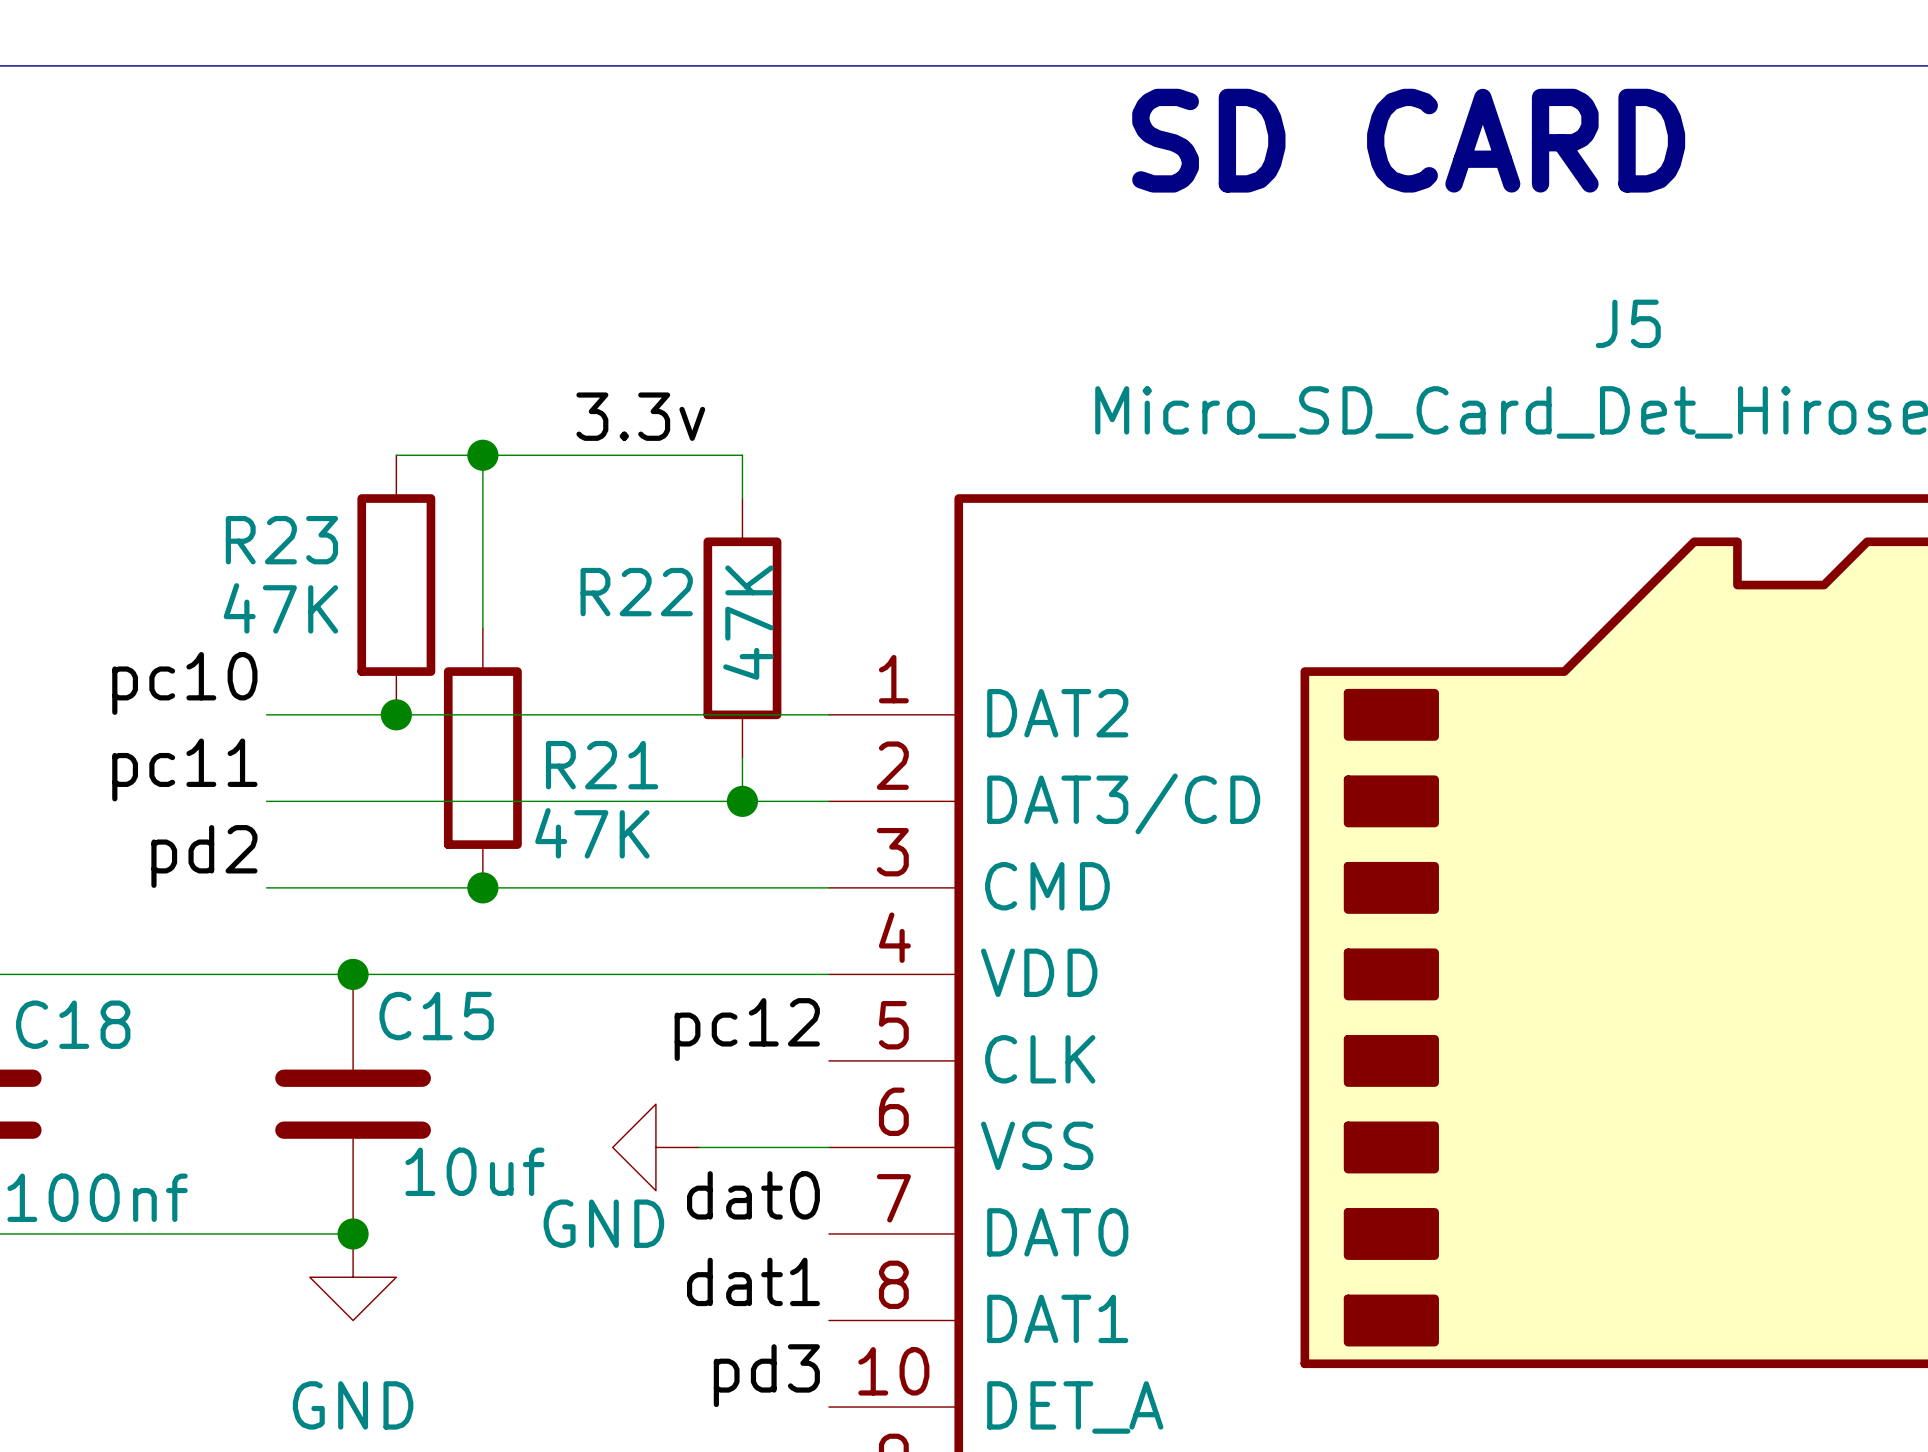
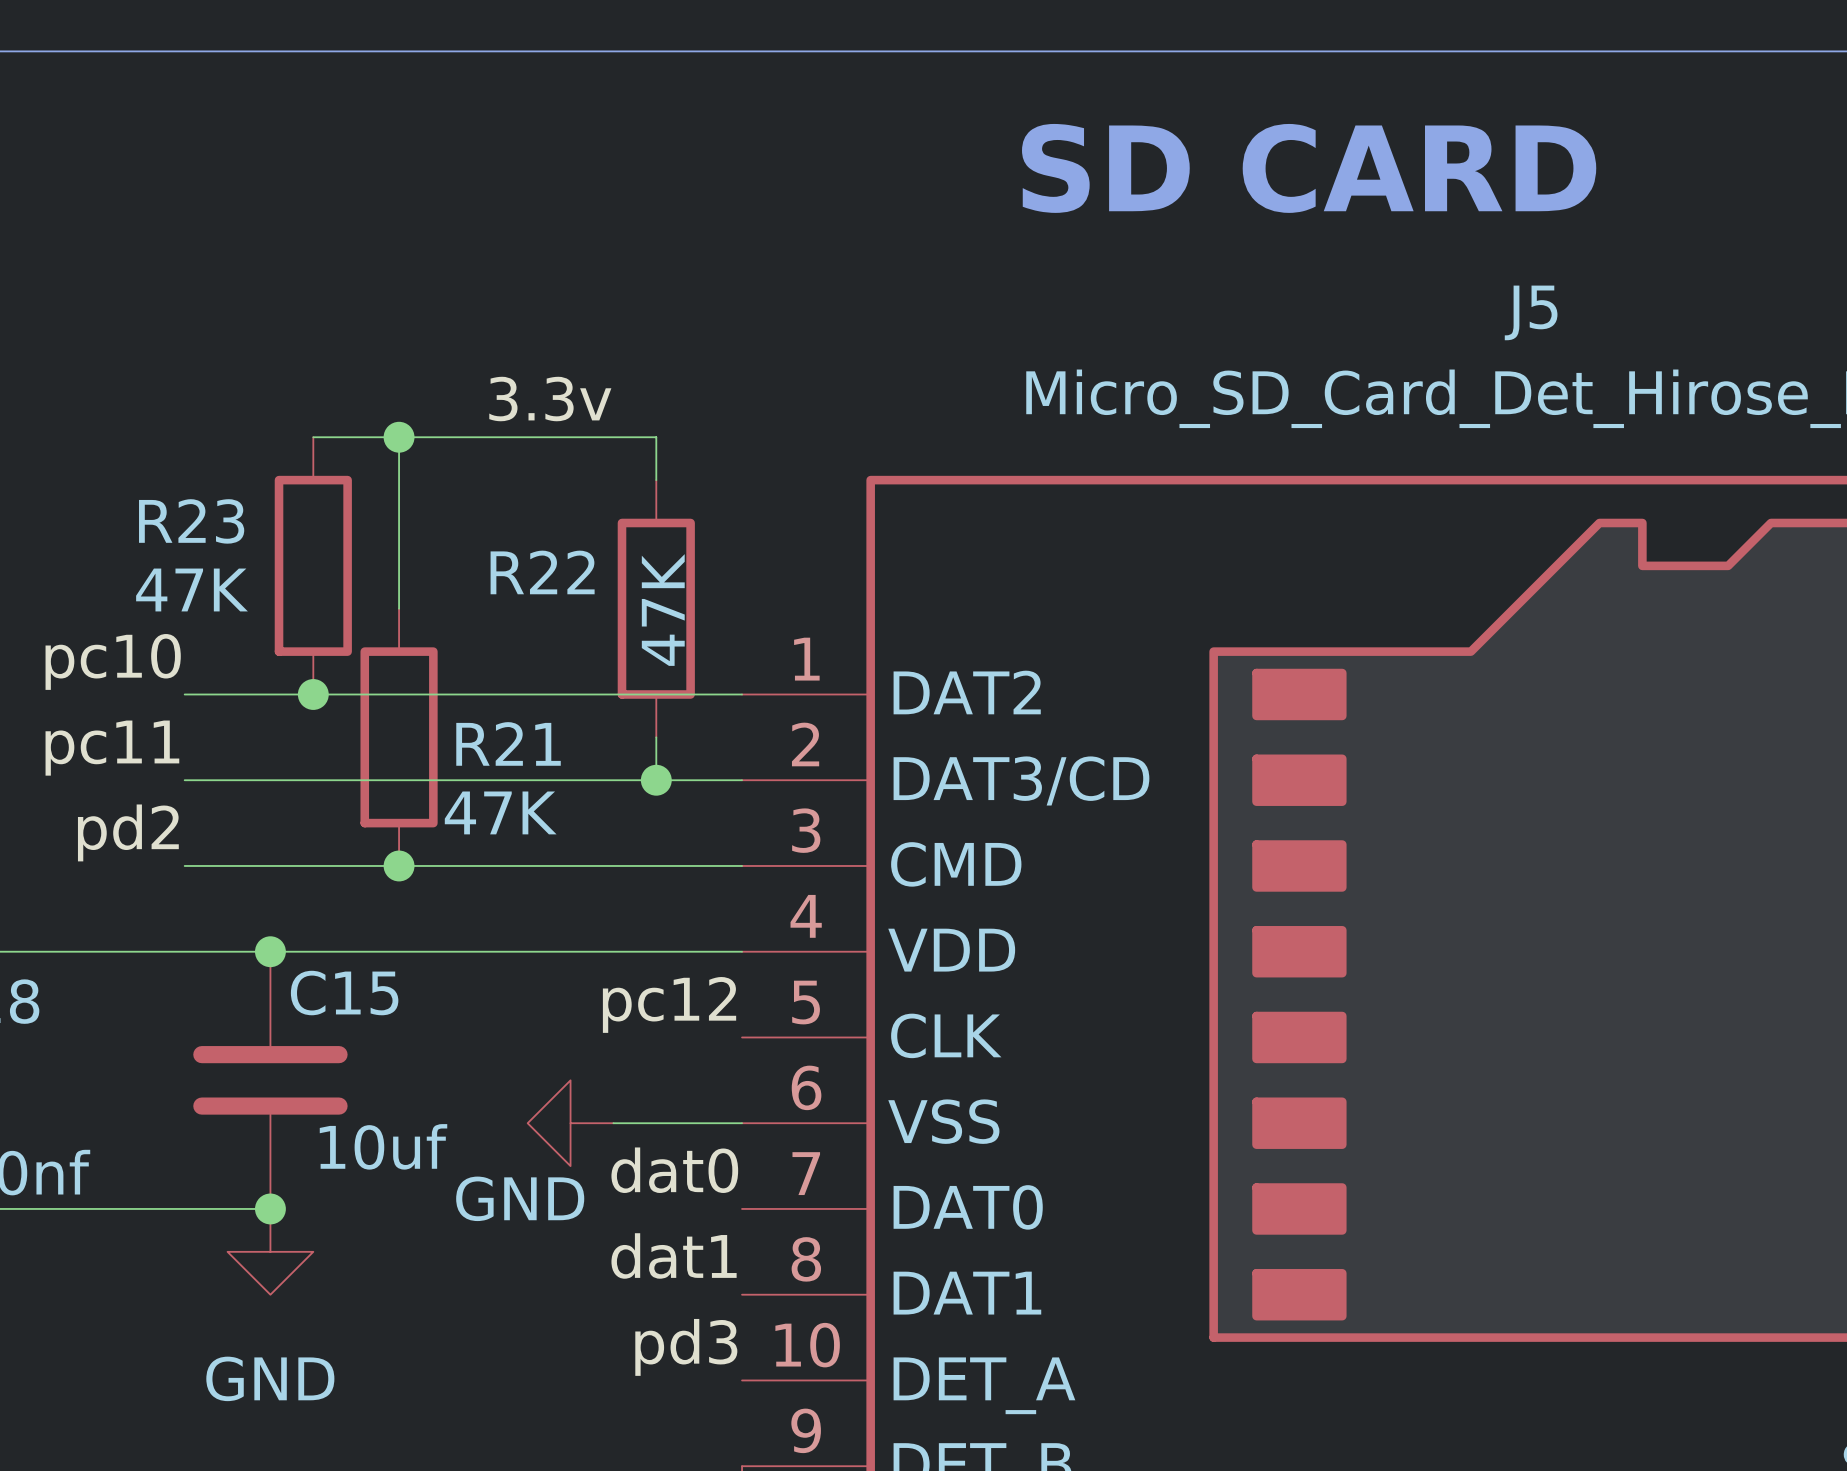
text position: SD CARD (1408, 140) -> SD CARD (1309, 168)

